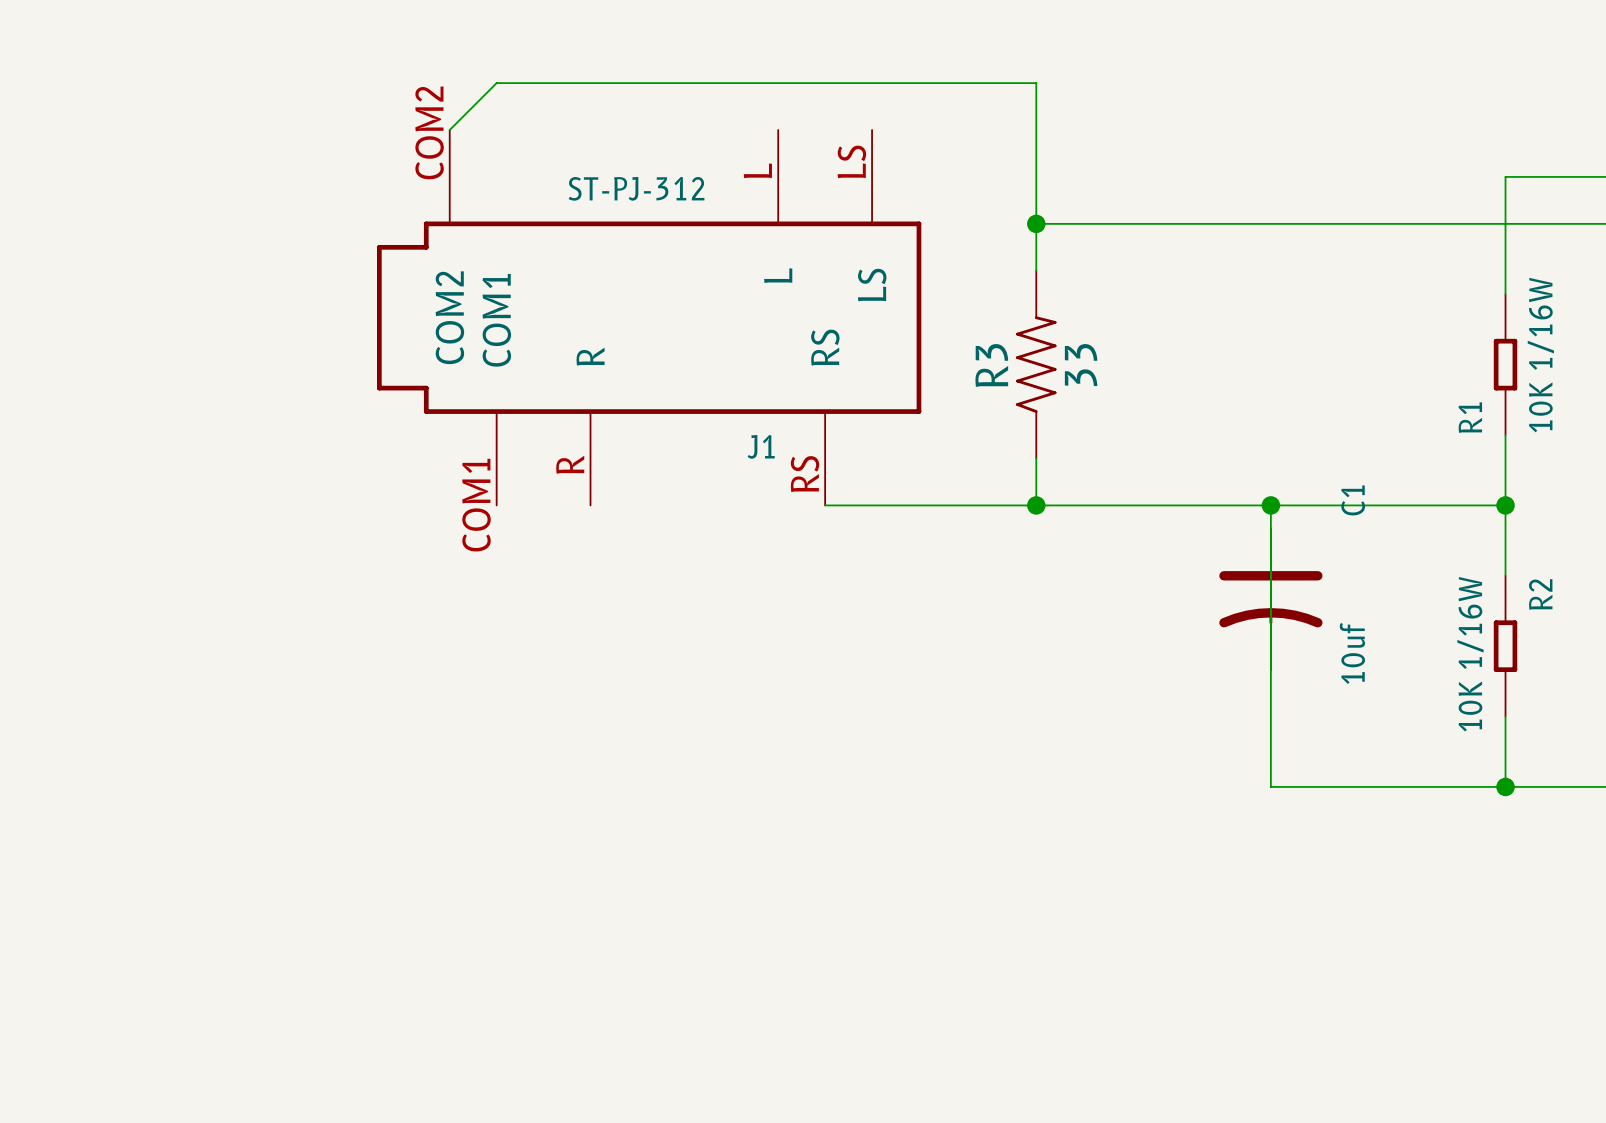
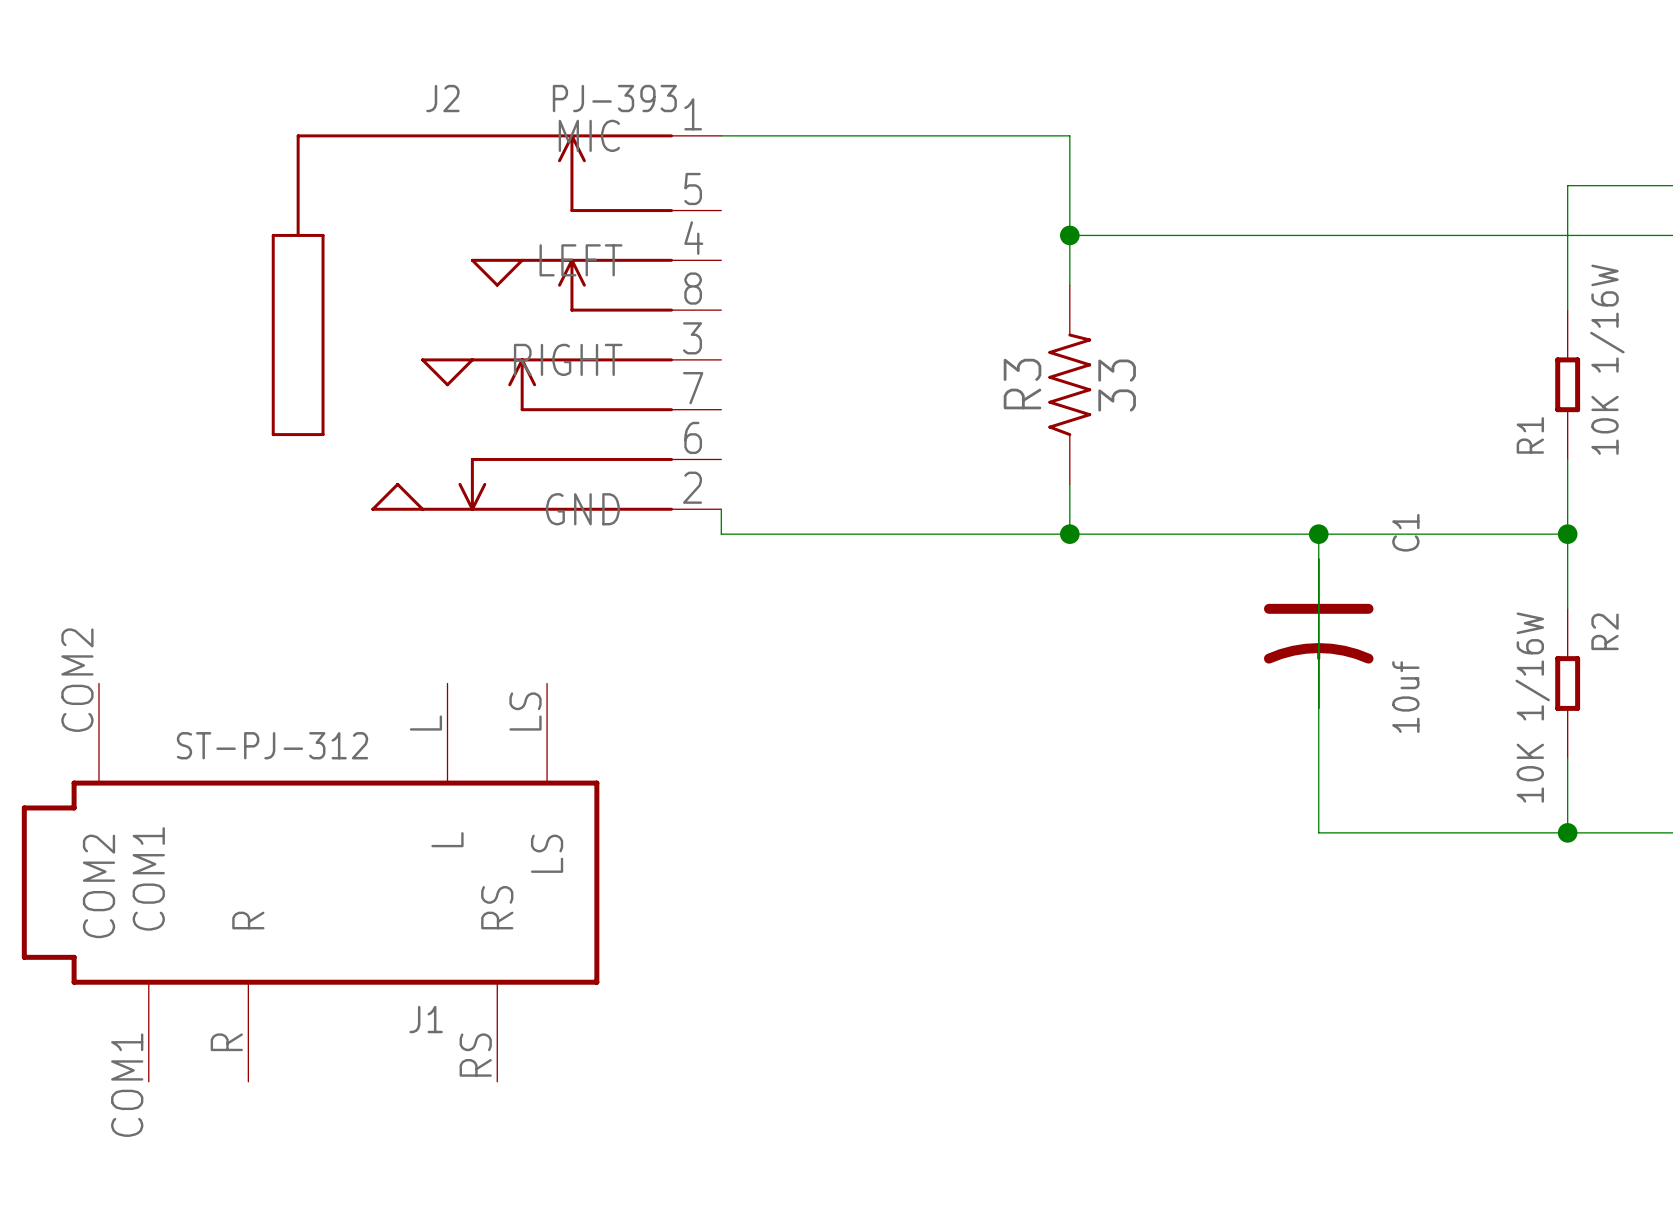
wire: (449, 130) (496, 83) (1036, 83) (1036, 130) -> (721, 135) (1069, 135)
J2: none -> PJ-393 (496, 322)
J1 position: (649, 317) -> (310, 882)
wire: none -> (721, 509) (721, 534) (845, 534)

